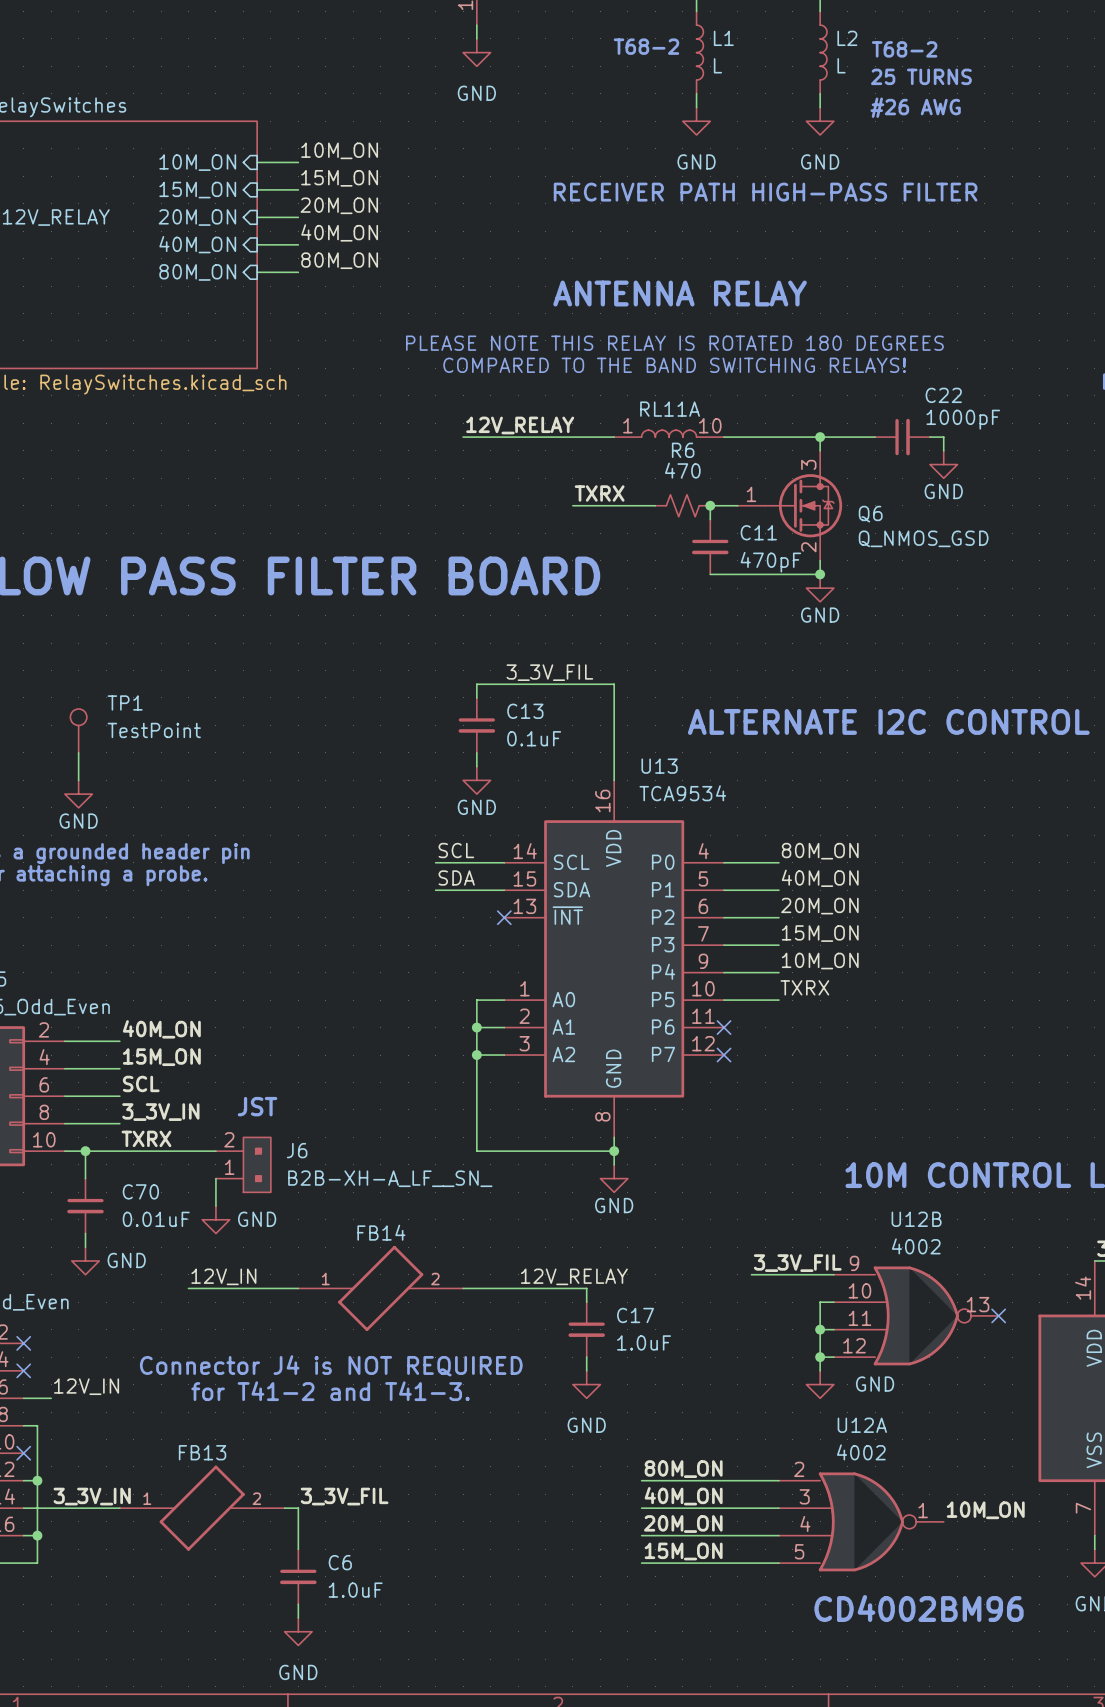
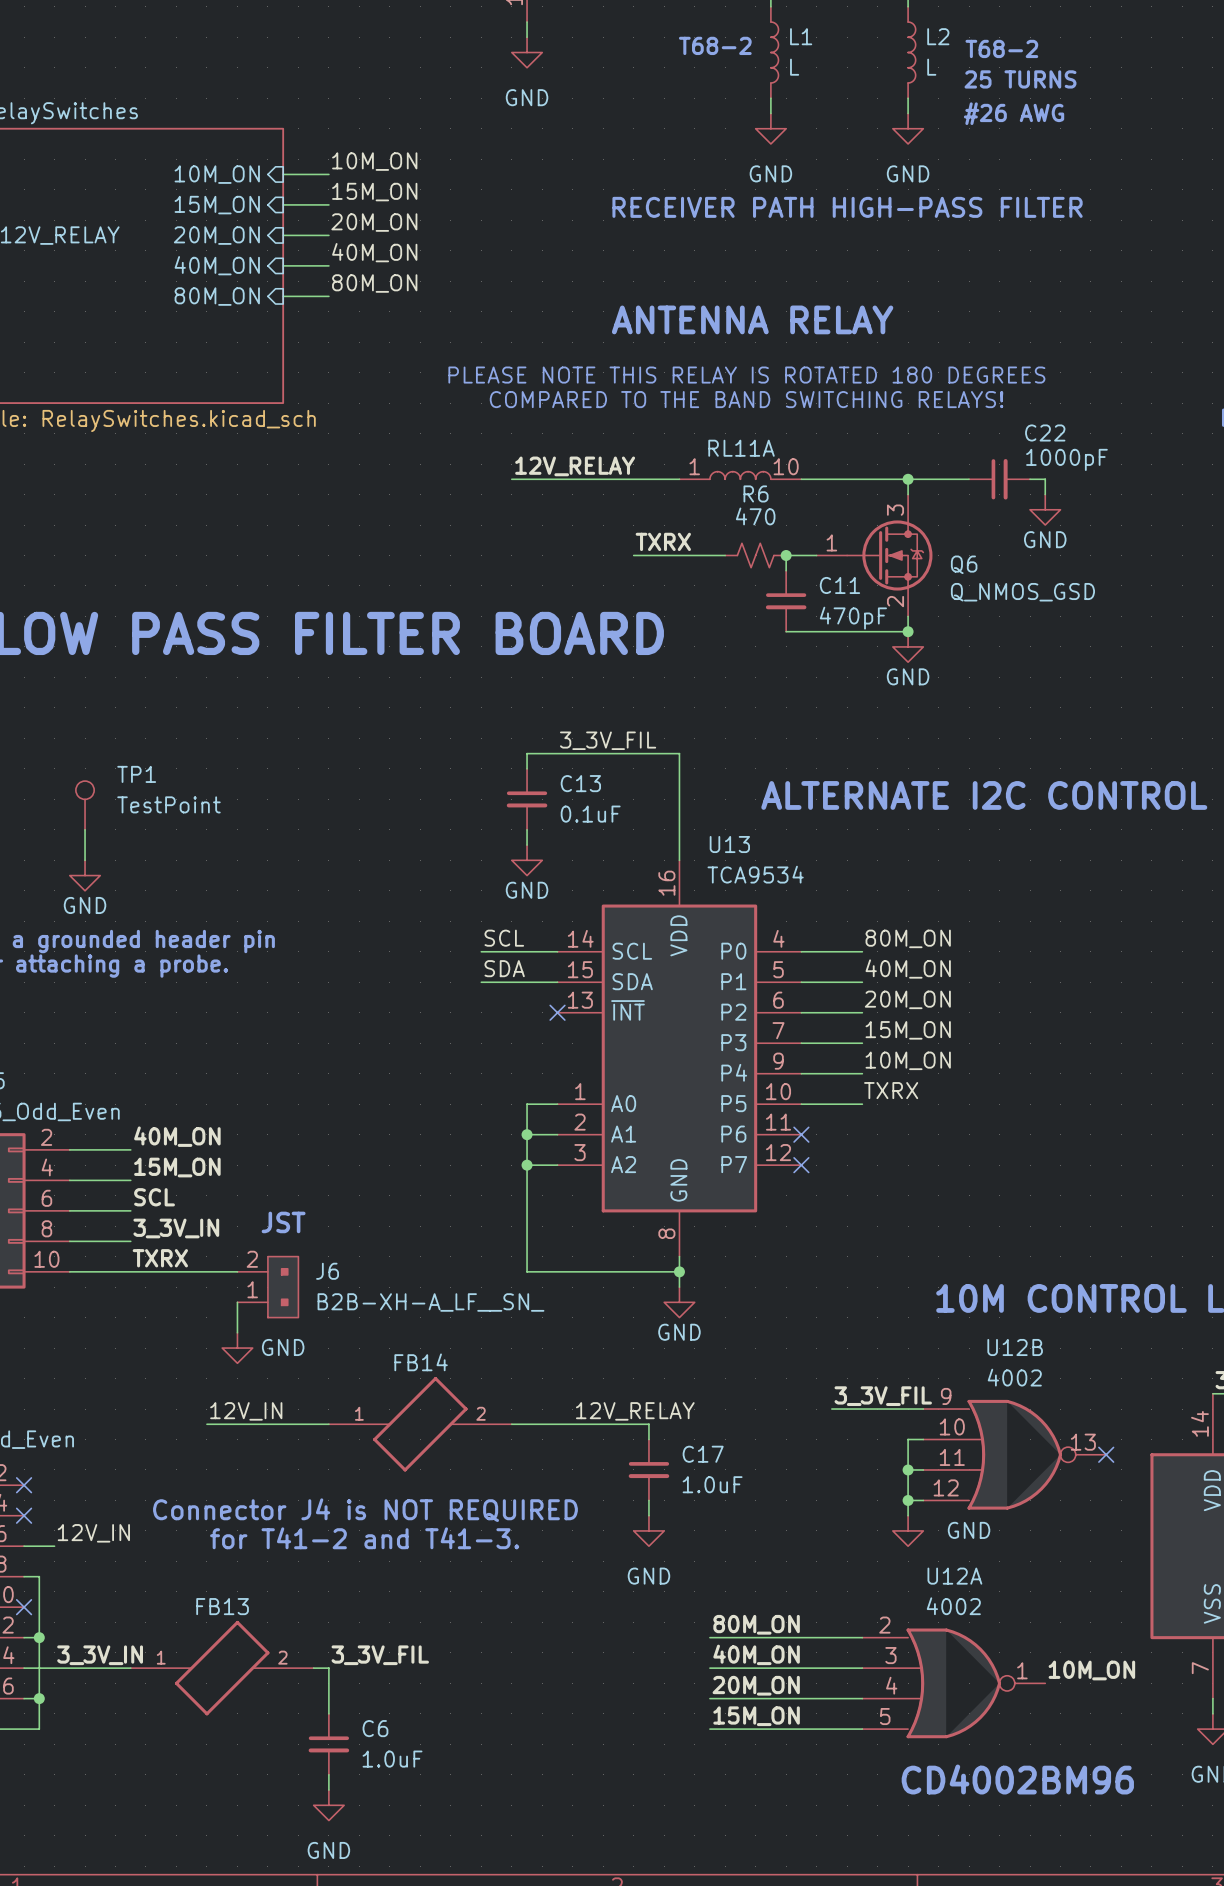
wire: (85, 1151) (85, 1178) -> none
junction: (85, 1151) -> none
C70: 0.01uF (85, 1206) -> none
wire: (85, 1233) (85, 1247) -> none
power symbol: GND (85, 1260) -> none

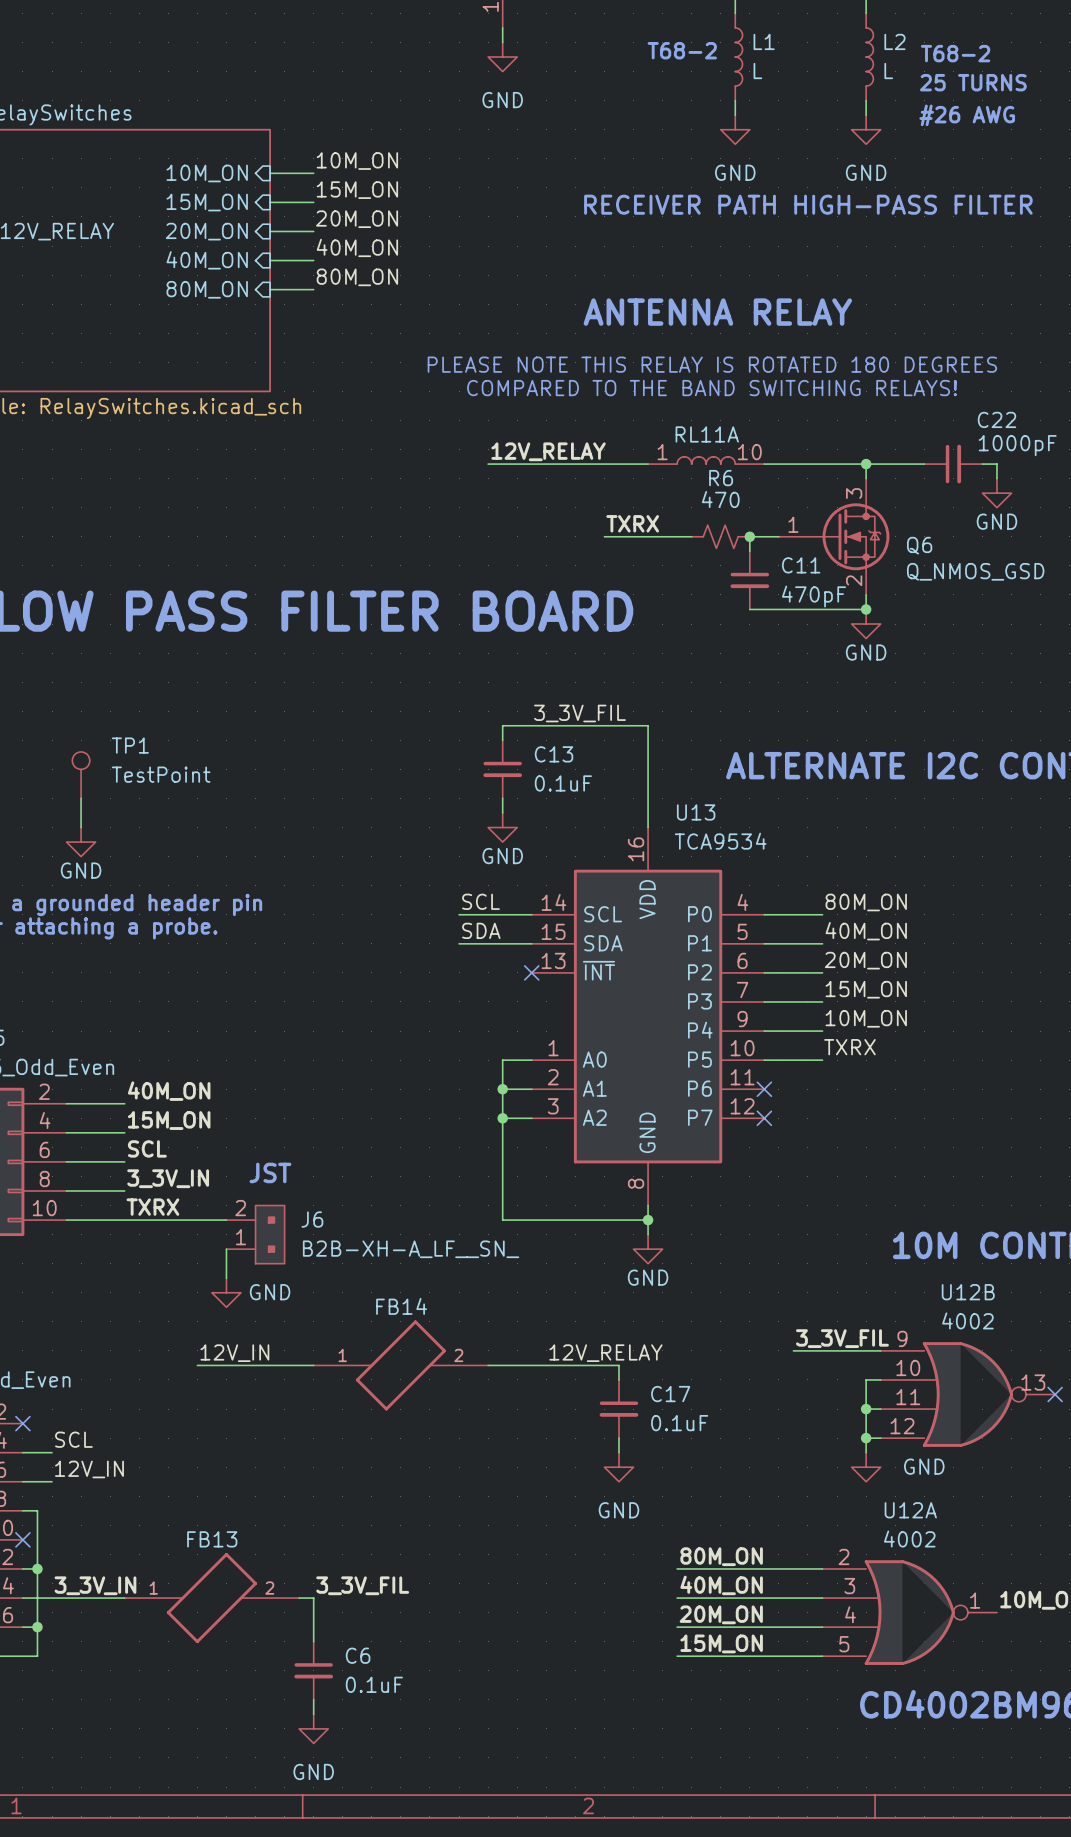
C17 value: 1.0uF (712, 1484) -> 0.1uF (679, 1423)
label: none -> SCL (73, 1439)
text: Connector J4 is NOT REQUIRED (365, 1510) -> none
wire: none -> (22, 1452) (52, 1452)
no-connect mark: (24, 1515) -> none
text: for T41-2 and T41-3. (364, 1538) -> none
C6 value: 1.0uF (392, 1759) -> 0.1uF (374, 1684)

